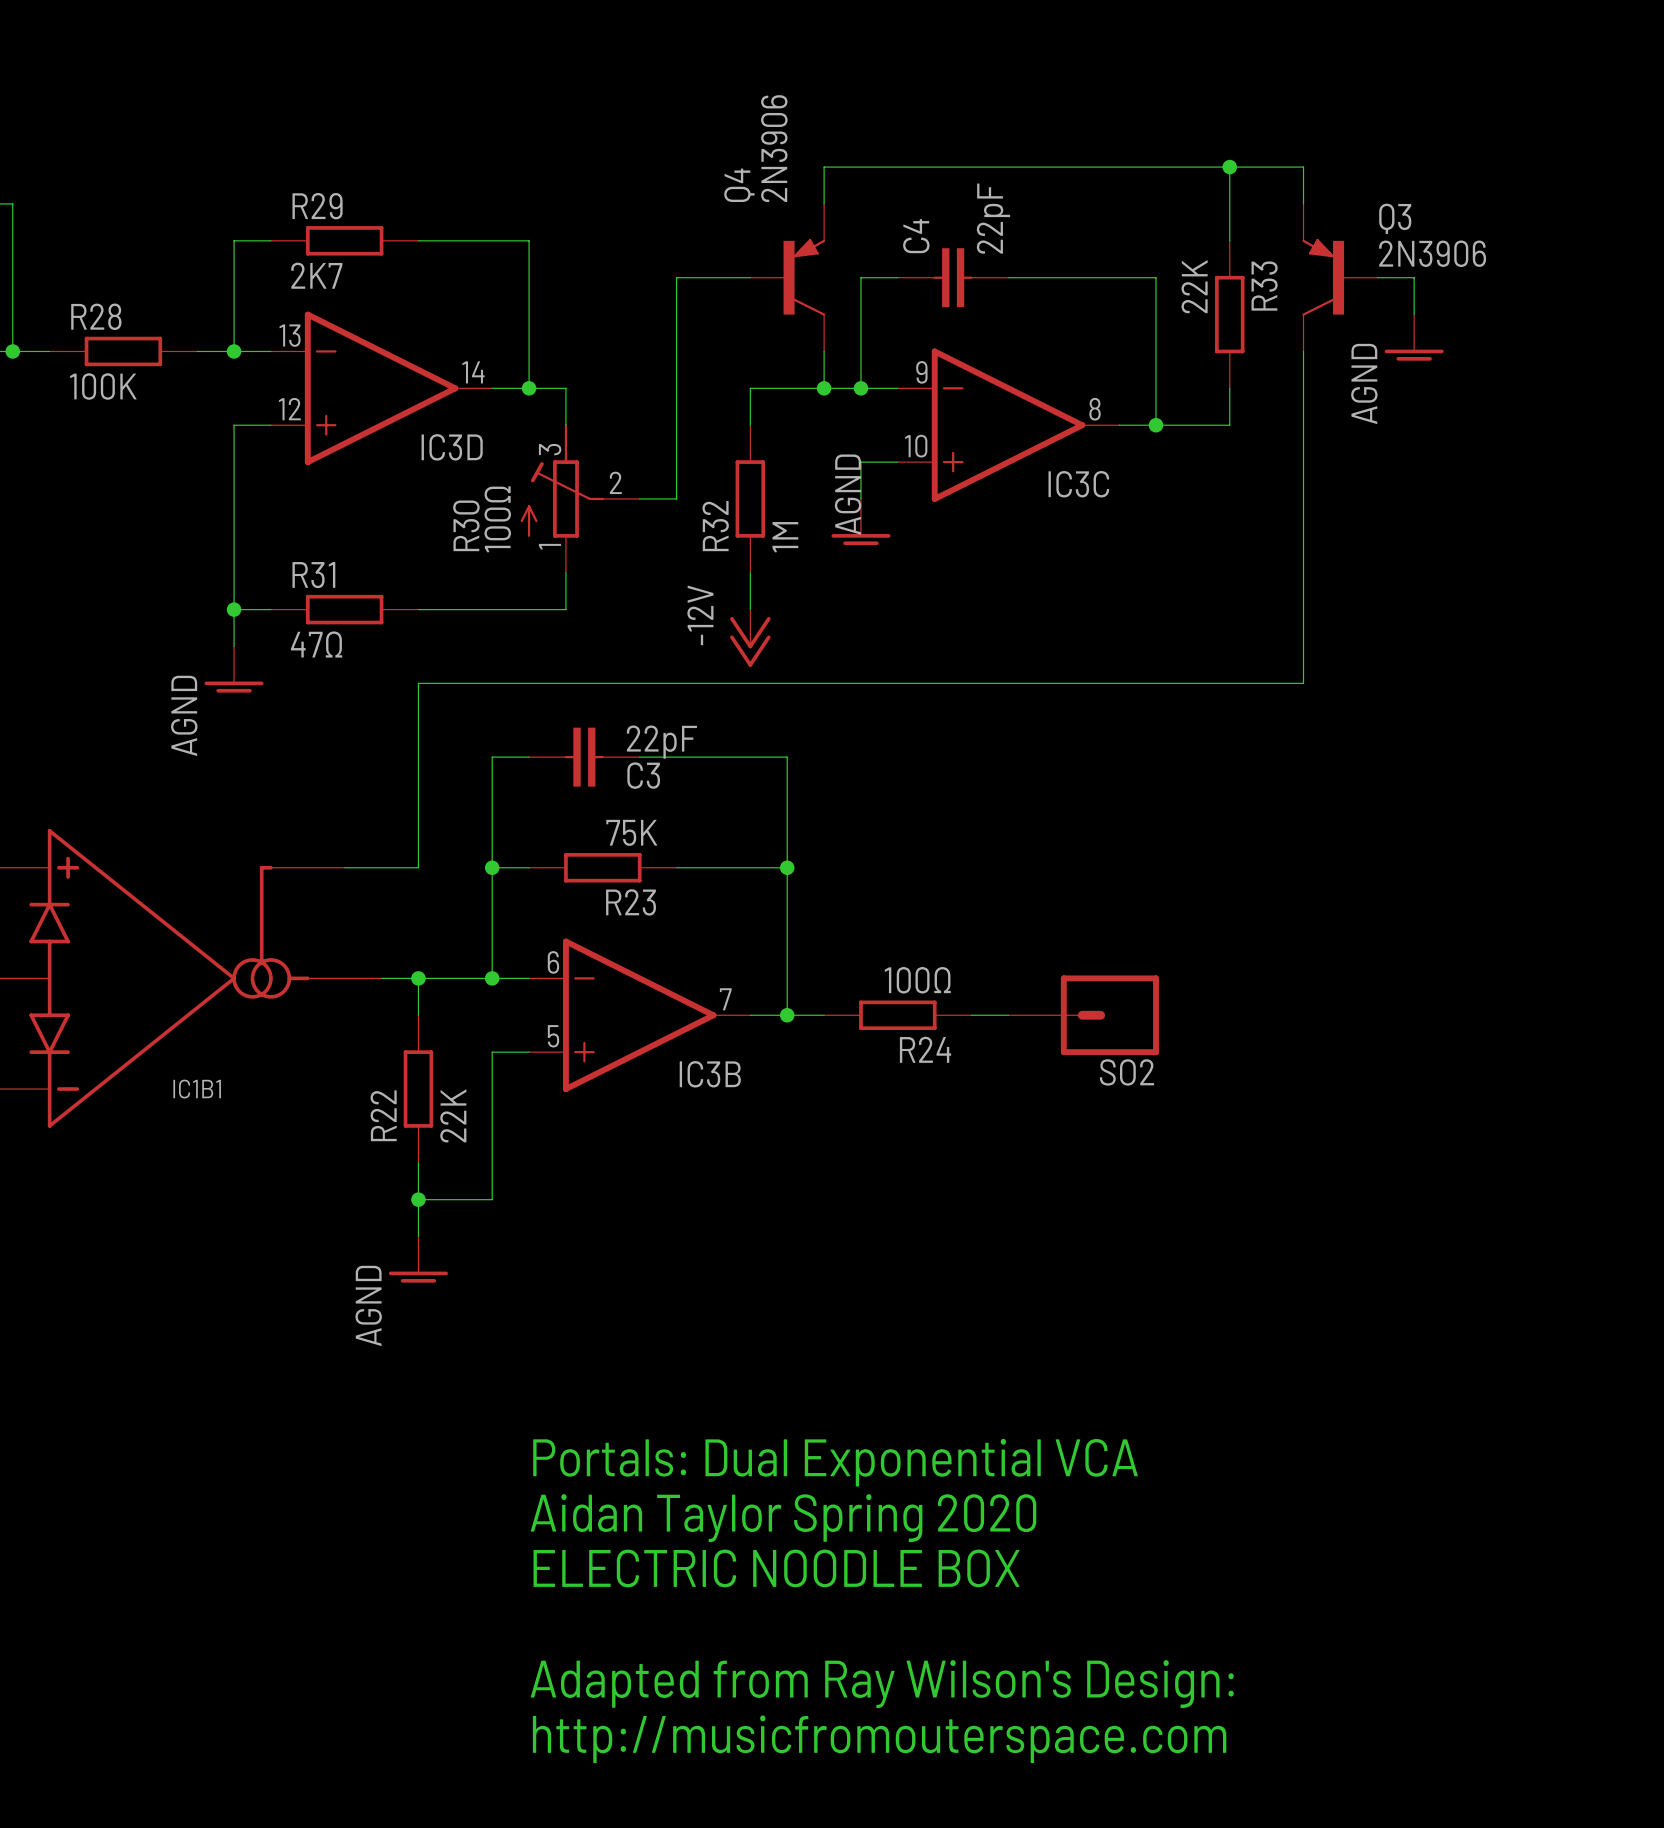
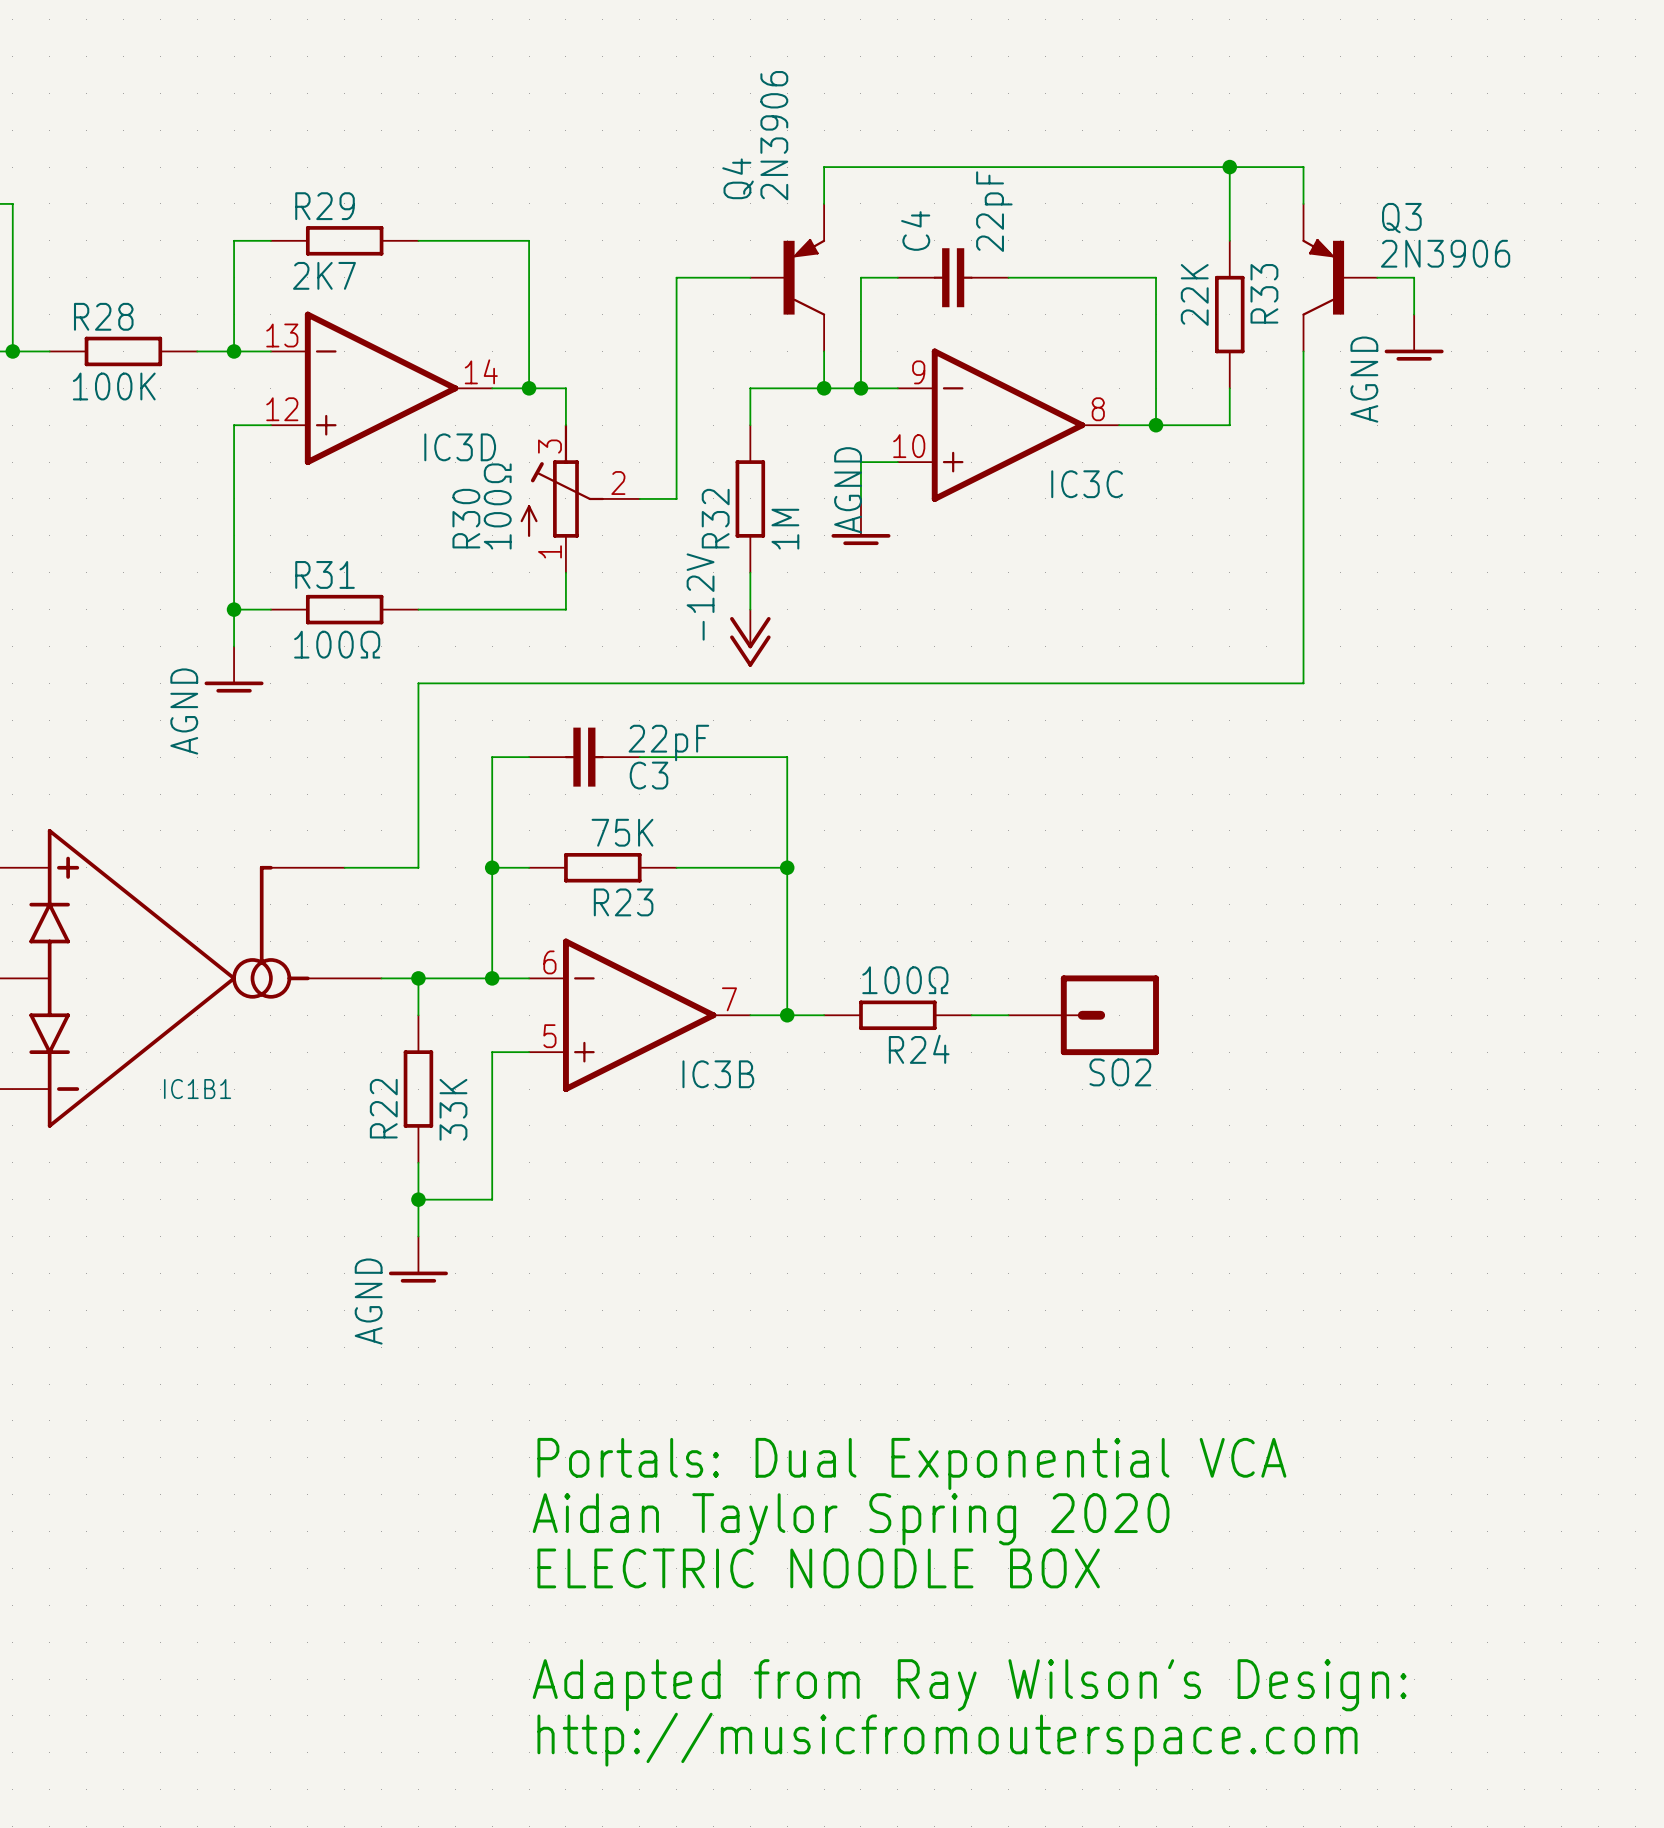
R31 value: 47Ω (316, 644) -> 100Ω (337, 644)
R22 value: 22K (453, 1115) -> 33K (453, 1109)

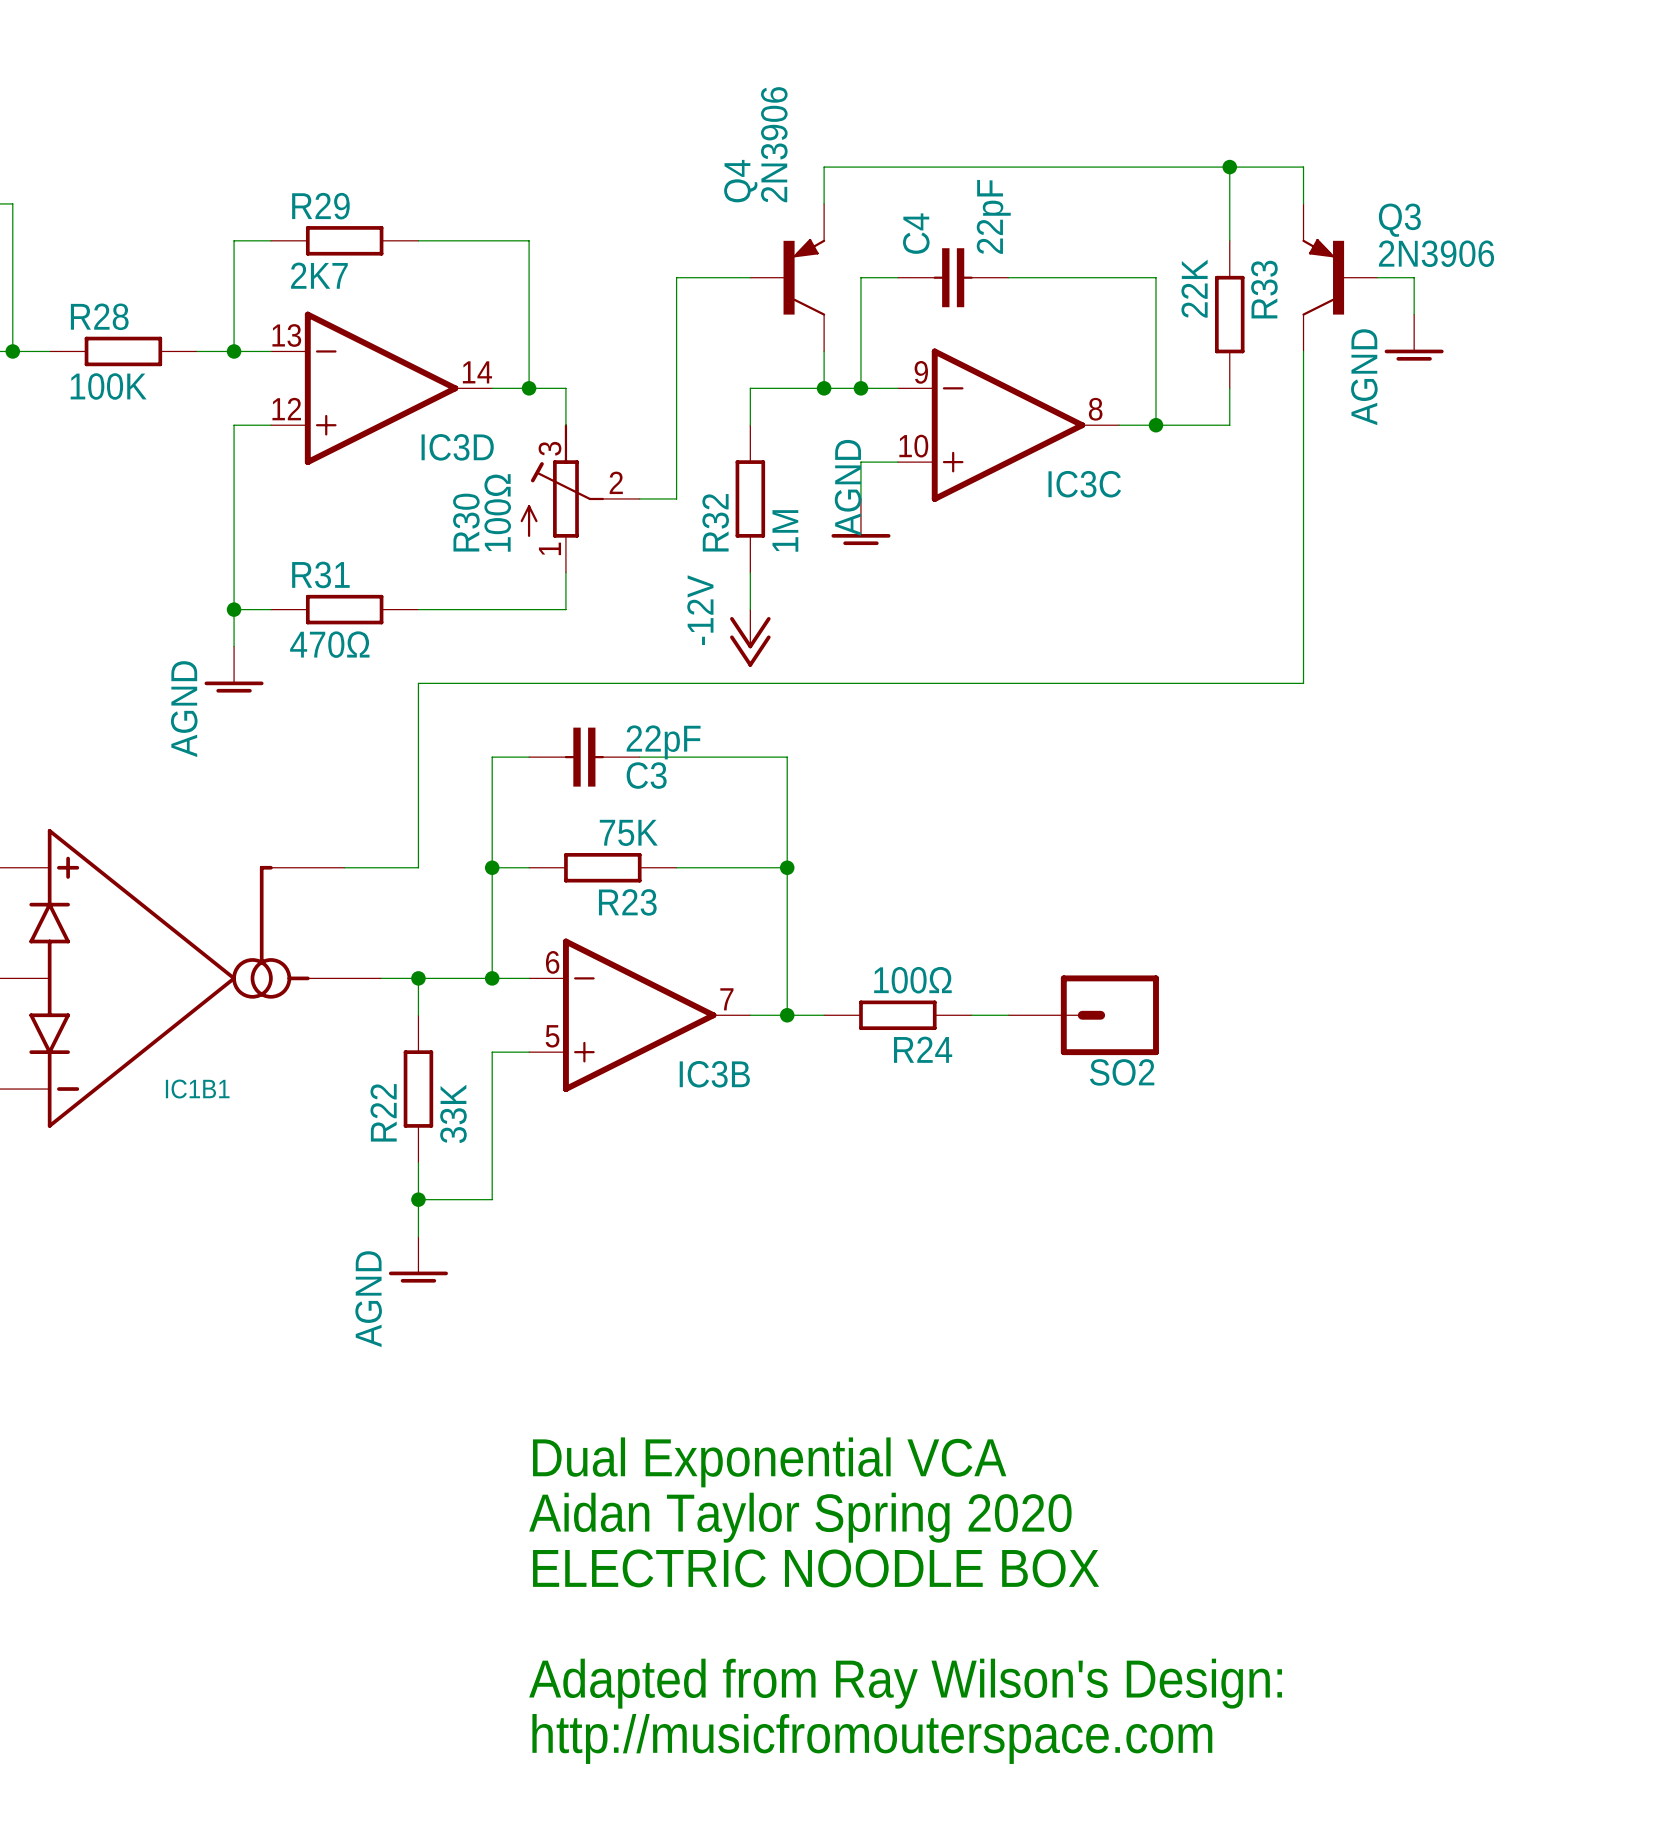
R31 value: 100Ω (337, 644) -> 470Ω (329, 644)
text: Portals: Dual Exponential VCA (911, 1463) -> Dual Exponential VCA (769, 1462)

